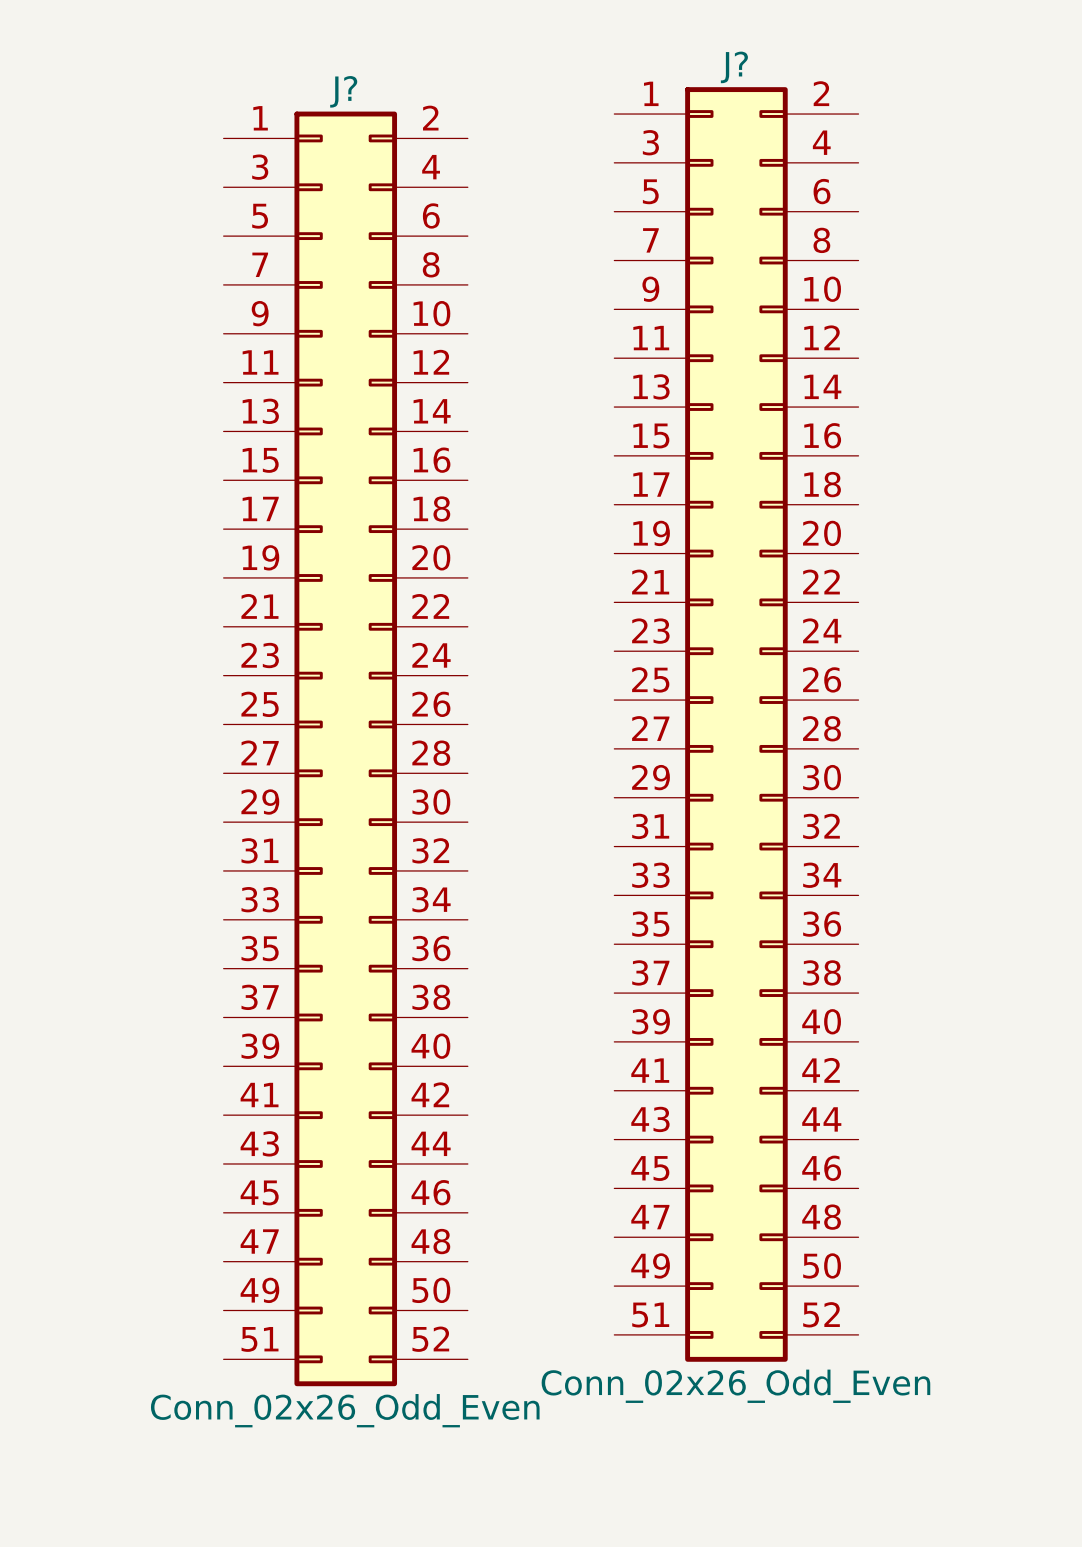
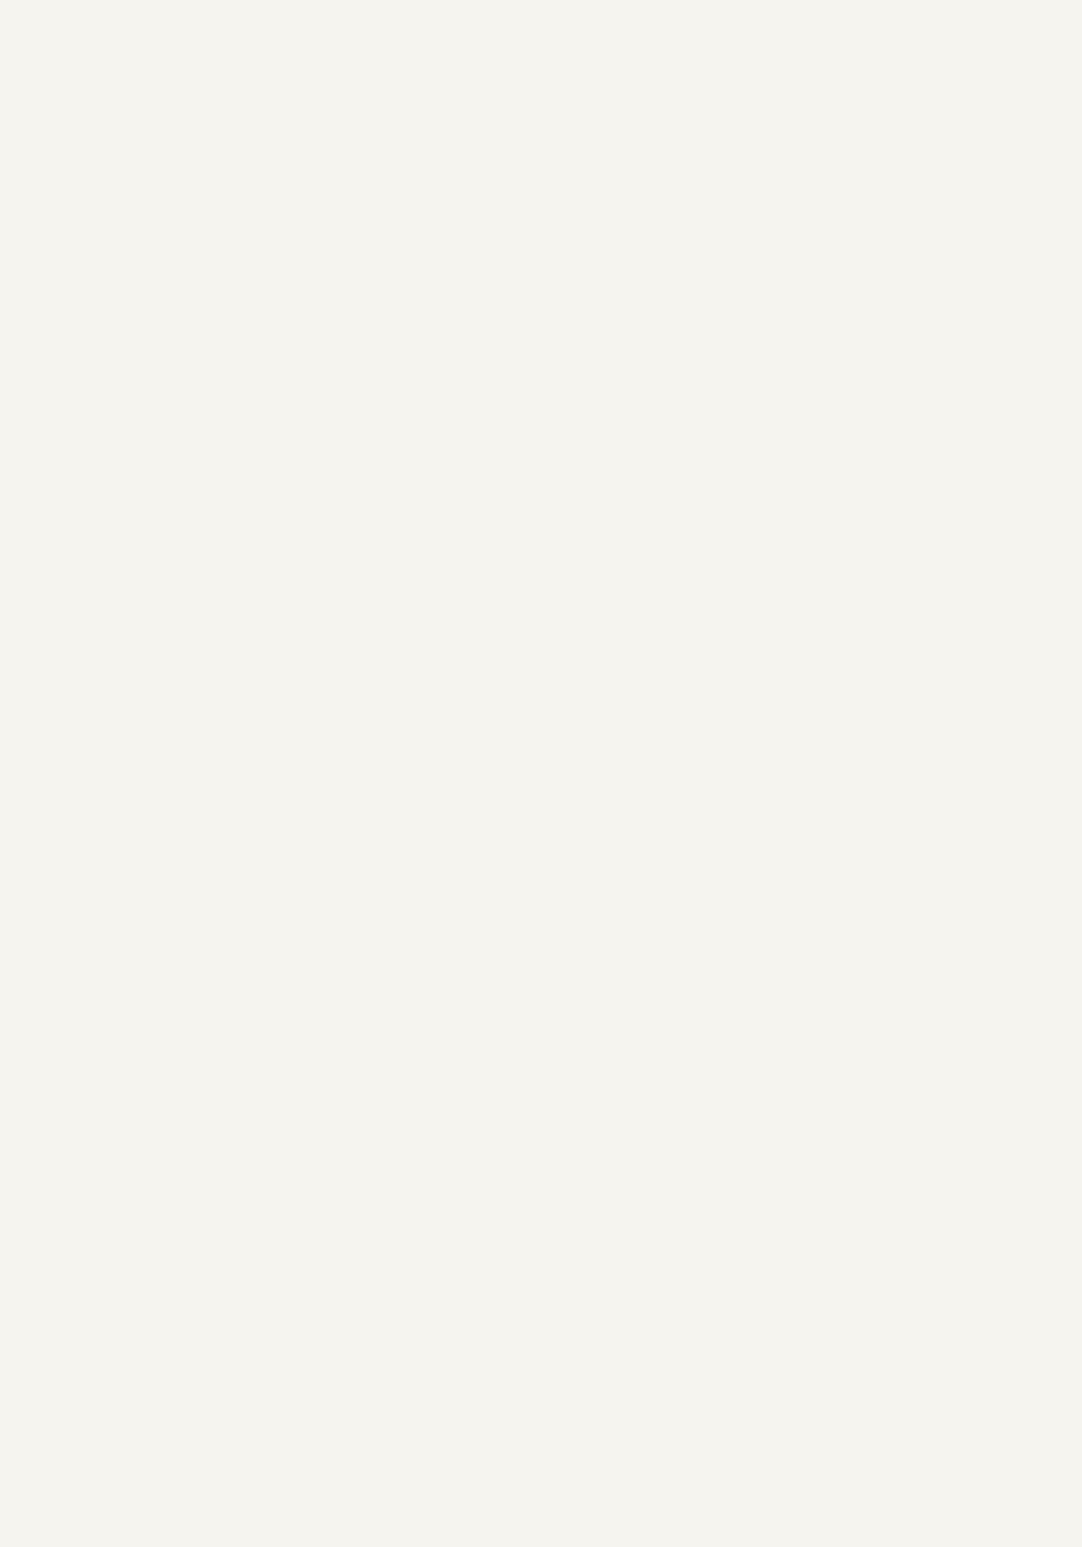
J?: Conn_02x26_Odd_Even (736, 724) -> none
J?: Conn_02x26_Odd_Even (345, 748) -> none

